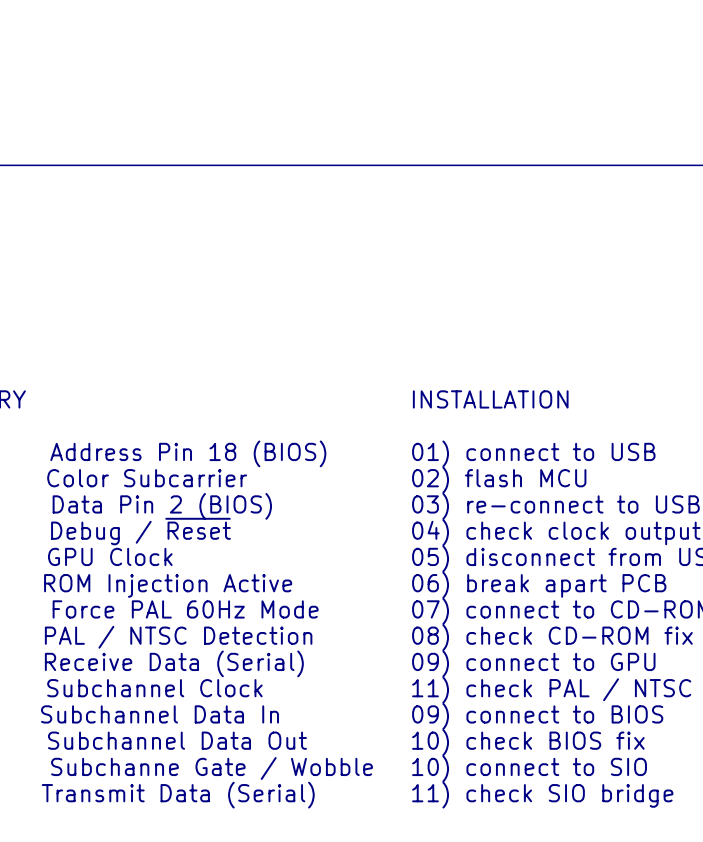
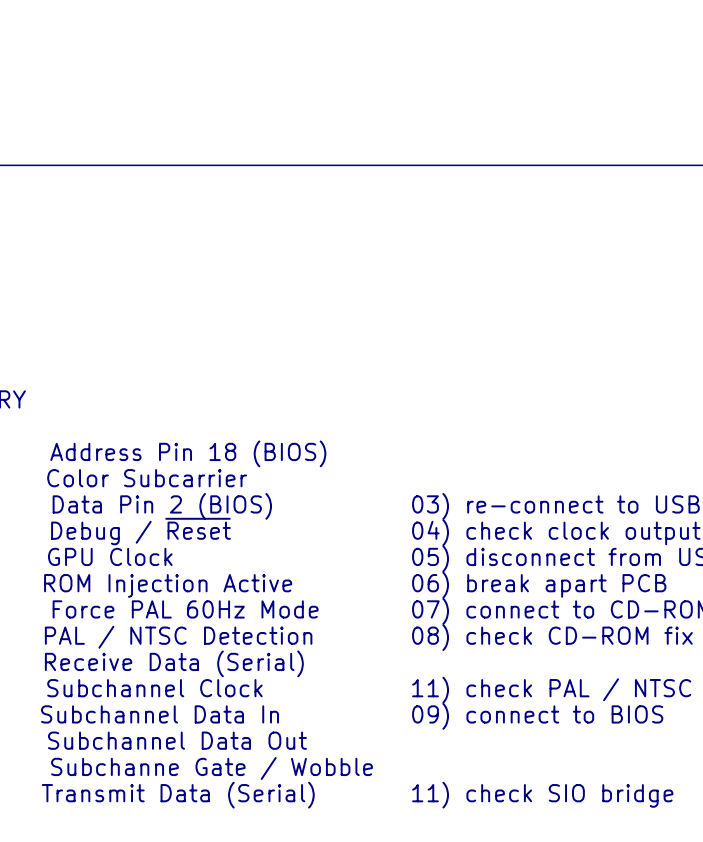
text: INSTALLATION (490, 399) -> none
text: 01) connect to USB (533, 453) -> none
text: 02) flash MCU (499, 480) -> none
text: 09) connect to GPU (533, 663) -> none
text: 10) check BIOS fix (528, 742) -> none
text: 10) connect to SIO (529, 768) -> none

